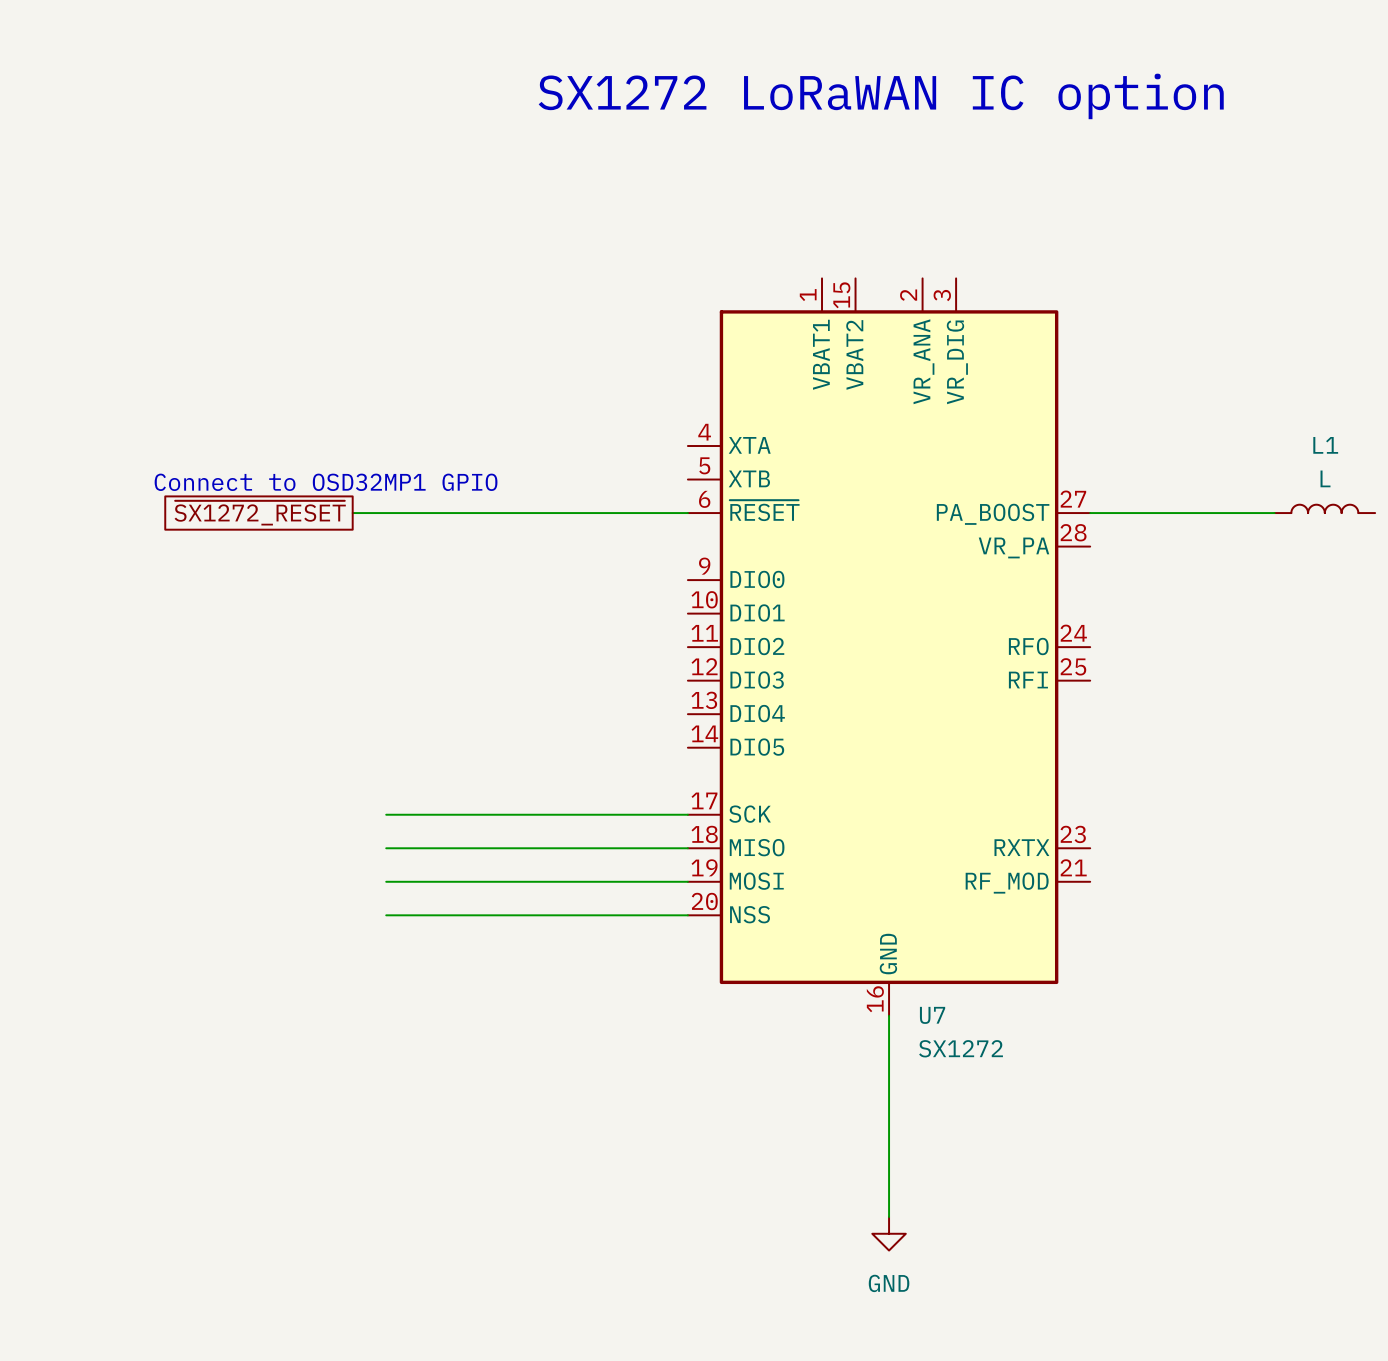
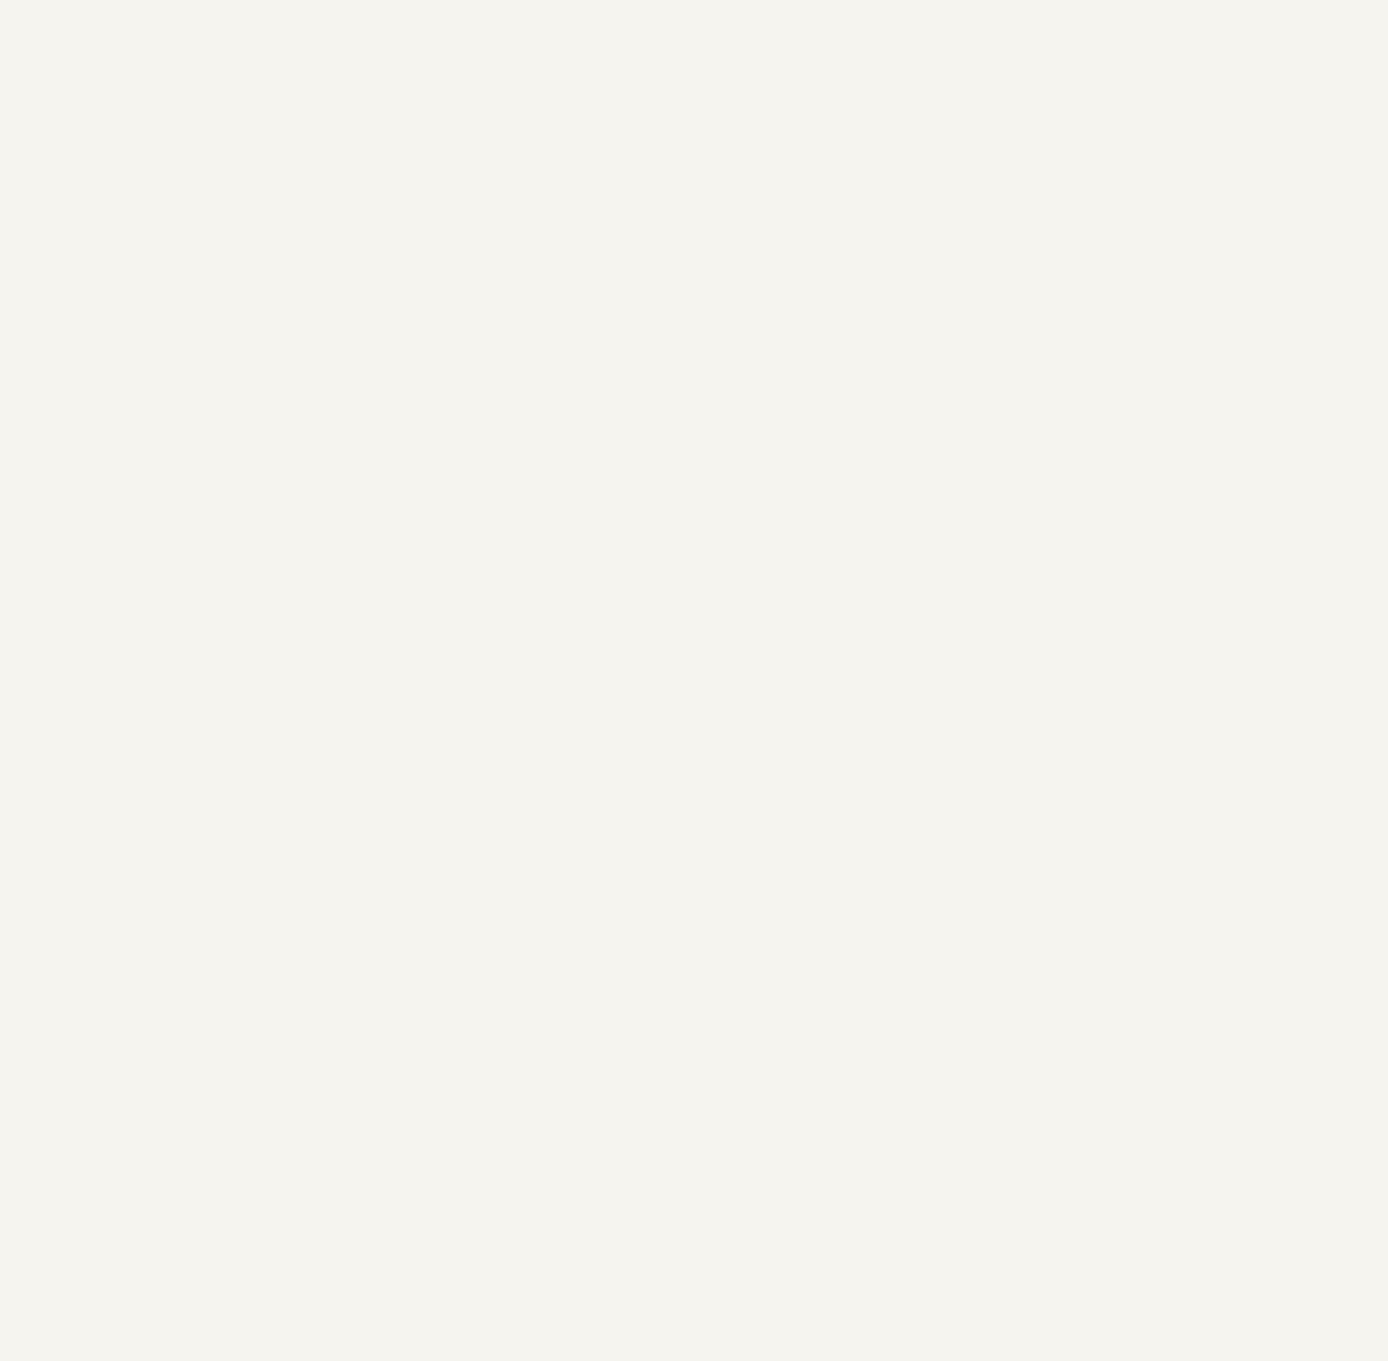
text: SX1272 LoRaWAN IC option (881, 96) -> none
text: Connect to OSD32MP1 GPIO (326, 482) -> none
L1: L (1324, 508) -> none
global label: ~{SX1272_RESET} (260, 513) -> none
wire: (352, 513) (687, 513) -> none
wire: (1090, 513) (1274, 513) -> none
U7: SX1272 (889, 647) -> none
wire: (386, 814) (687, 814) -> none
wire: (386, 848) (687, 848) -> none
wire: (386, 881) (687, 881) -> none
wire: (386, 915) (687, 915) -> none
wire: (889, 1015) (889, 1217) -> none
power symbol: GND (889, 1233) -> none

